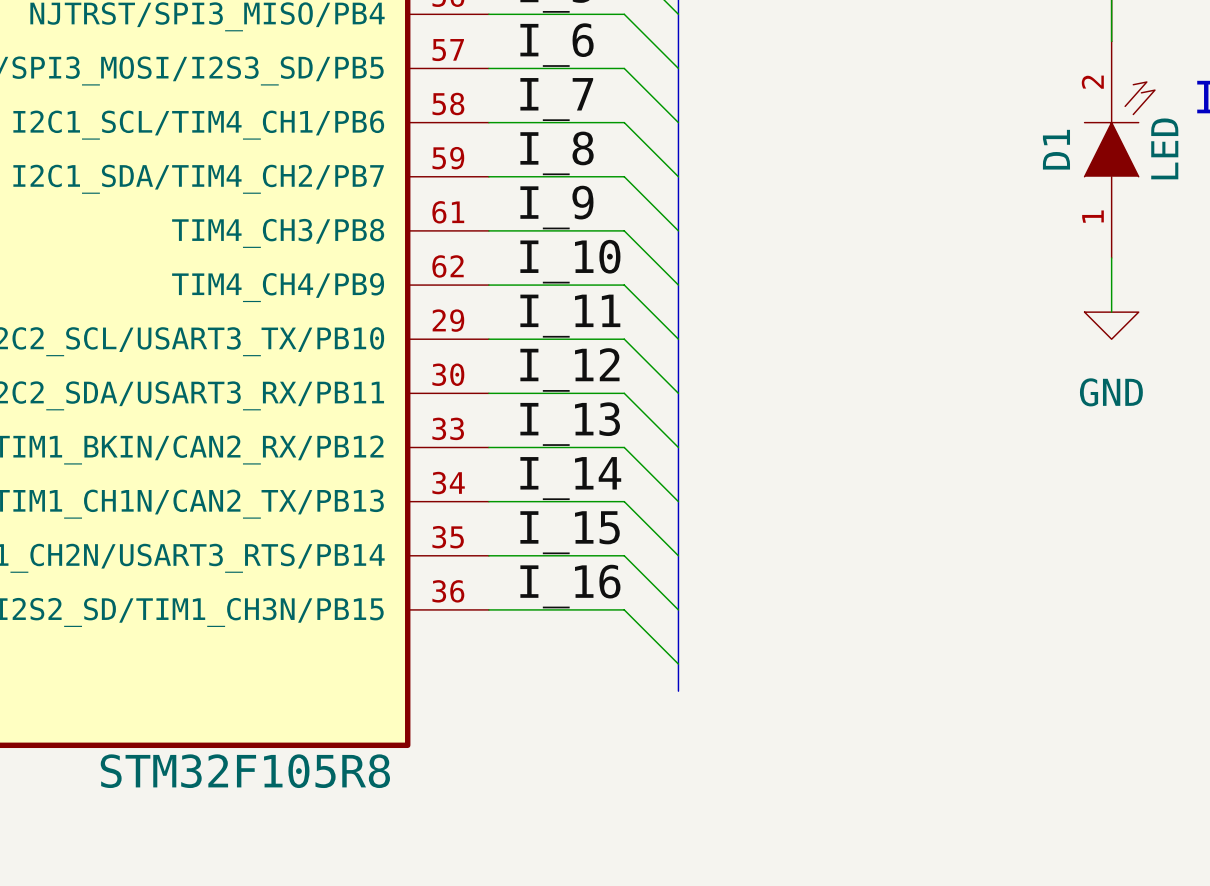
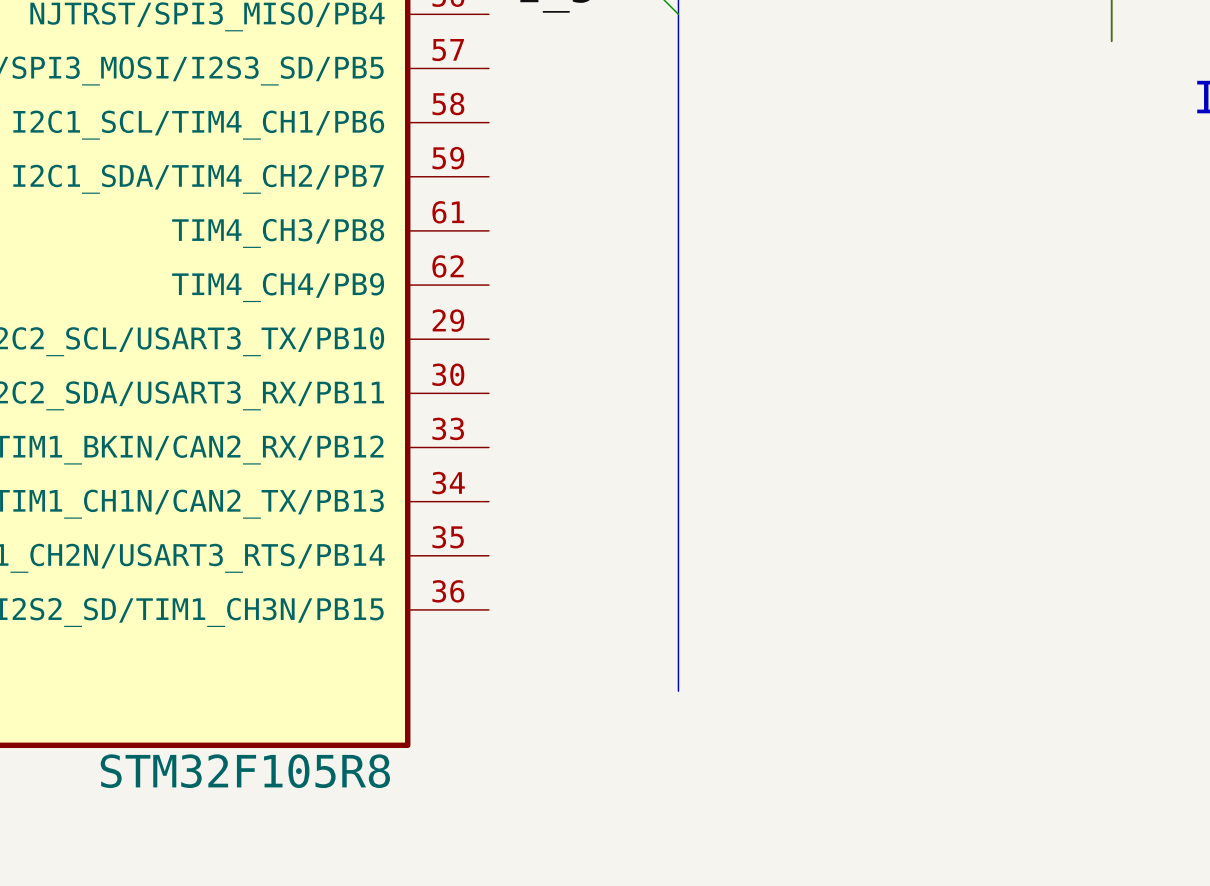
wire: (488, 14) (624, 14) (678, 68) -> none
label: I_6 (556, 45) -> none
wire: (488, 68) (624, 68) (678, 122) -> none
label: I_7 (556, 99) -> none
wire: (488, 122) (624, 122) (678, 176) -> none
D1: LED (1119, 149) -> none
label: I_8 (557, 153) -> none
wire: (488, 176) (624, 176) (678, 230) -> none
label: I_9 (556, 207) -> none
wire: (488, 230) (624, 230) (678, 285) -> none
wire: (1111, 257) (1111, 312) -> none
label: I_10 (570, 261) -> none
wire: (488, 285) (624, 285) (678, 339) -> none
label: I_11 (570, 316) -> none
power symbol: GND (1111, 325) -> none
wire: (488, 339) (624, 339) (678, 393) -> none
label: I_12 (569, 369) -> none
wire: (488, 393) (624, 393) (678, 447) -> none
label: I_13 (570, 424) -> none
wire: (488, 447) (624, 447) (678, 501) -> none
label: I_14 (570, 478) -> none
wire: (488, 501) (624, 501) (678, 555) -> none
label: I_15 (570, 532) -> none
wire: (488, 555) (624, 555) (678, 609) -> none
label: I_16 (570, 586) -> none
wire: (488, 609) (624, 609) (678, 664) -> none

